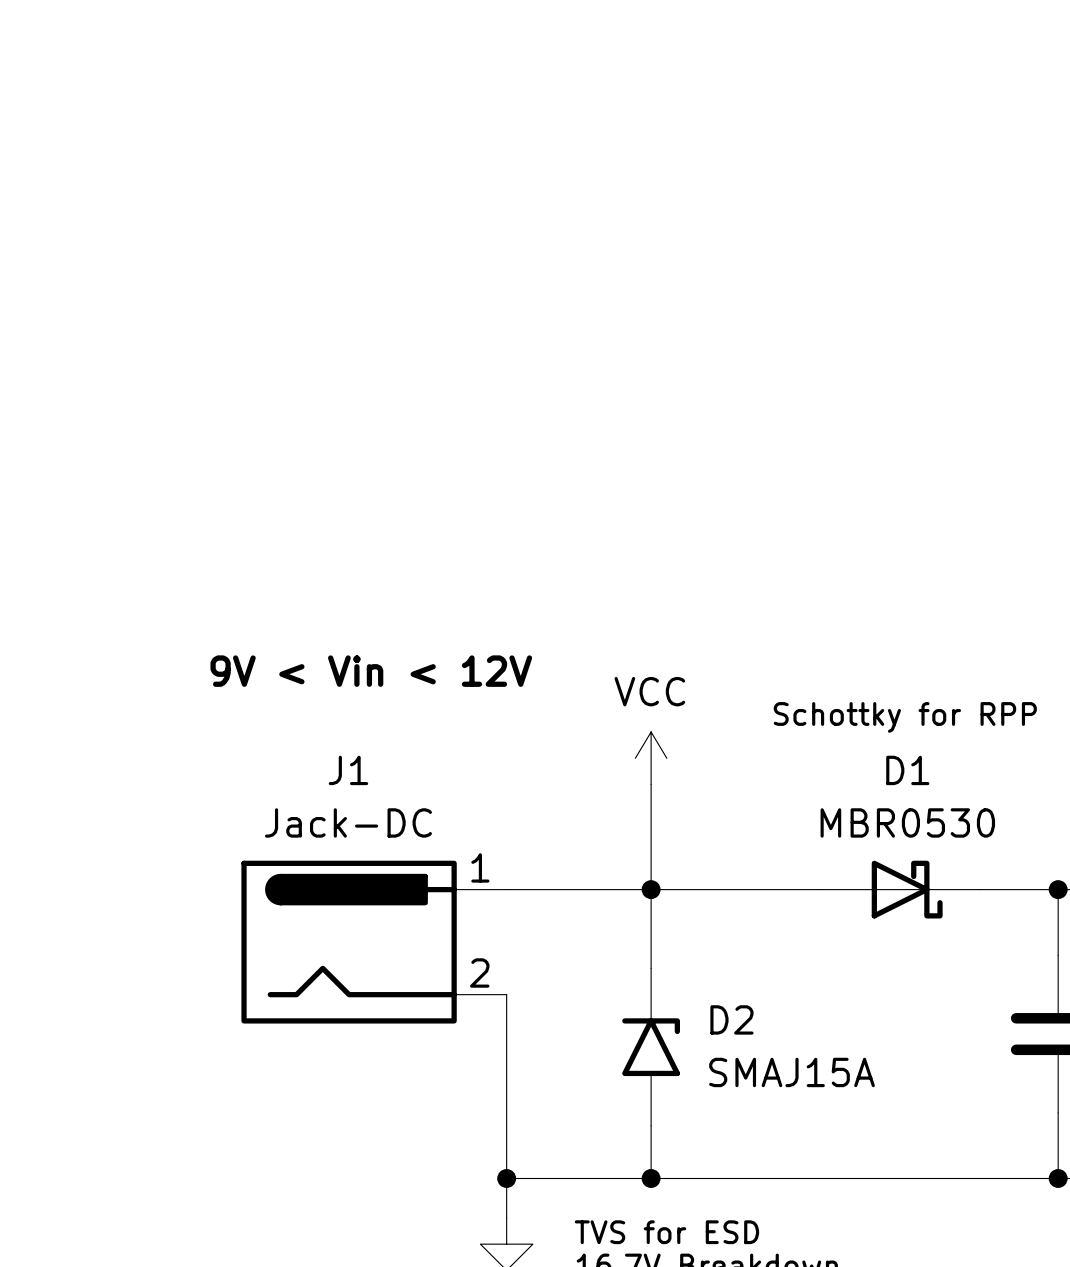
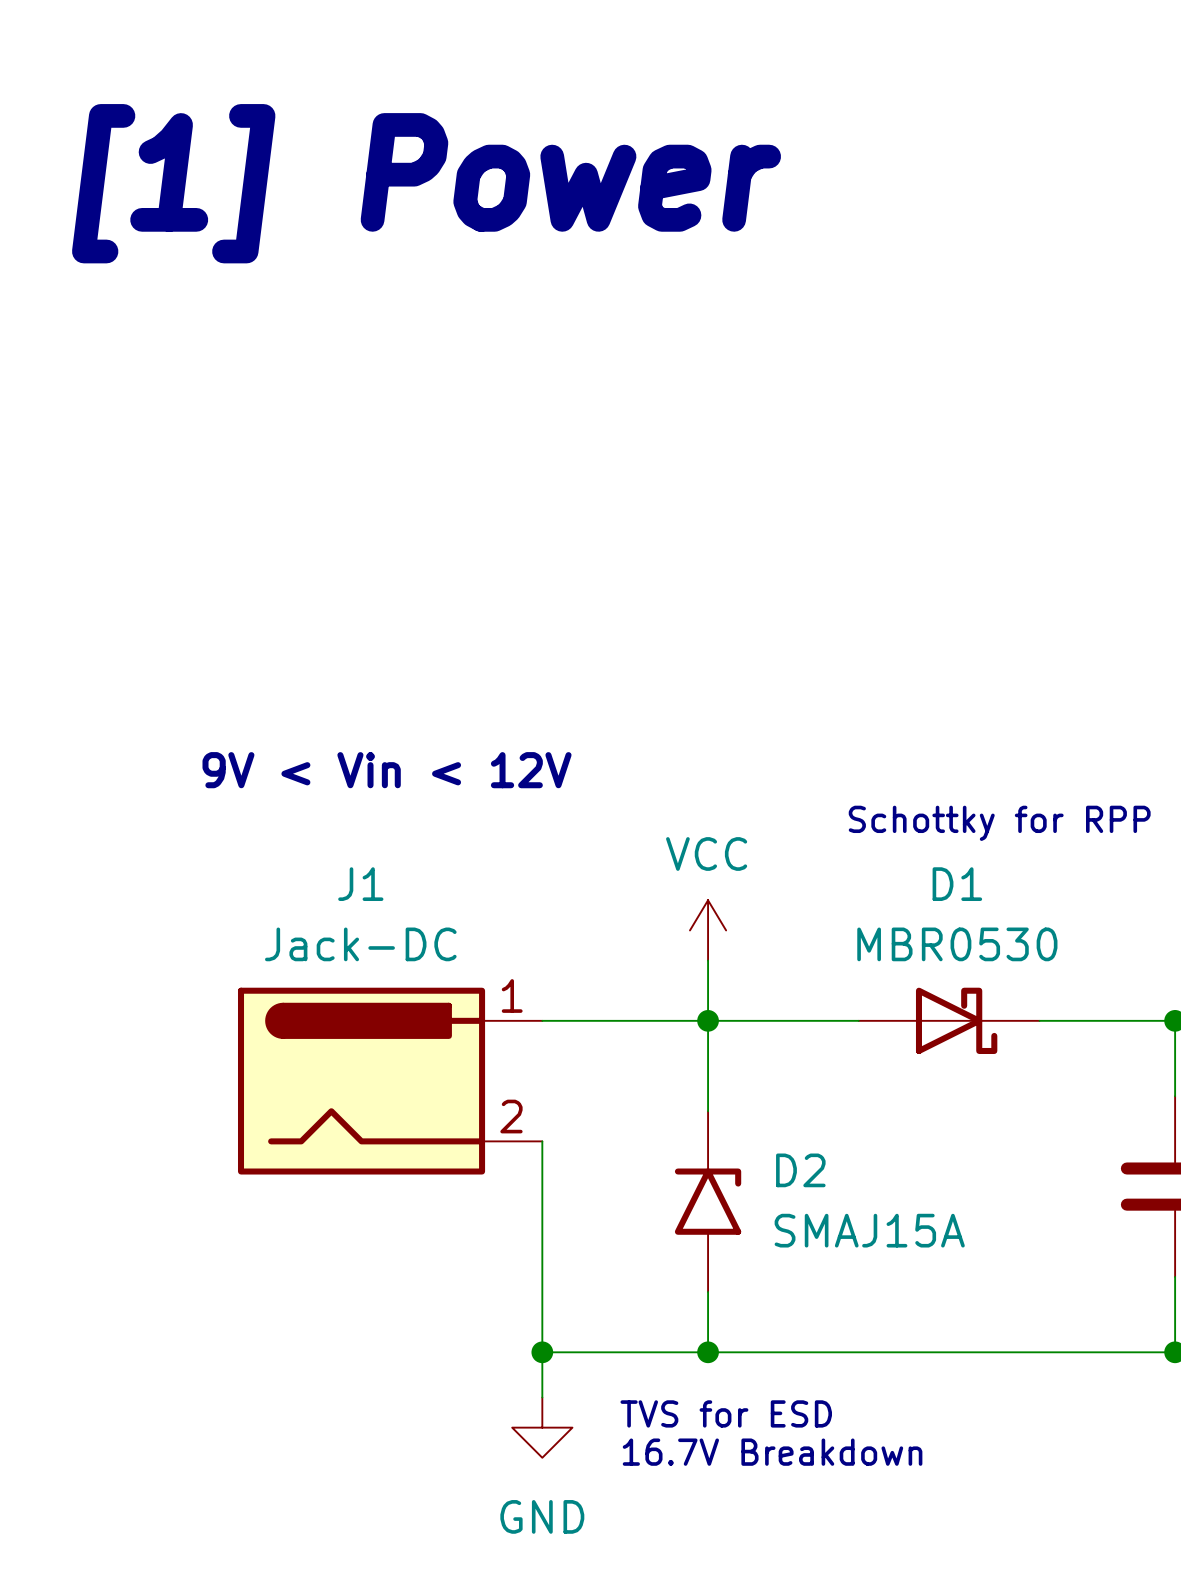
text: none -> [1] Power (426, 183)
power symbol position: VCC (651, 758) -> VCC (708, 930)
D1 position: (900, 889) -> (949, 1020)

